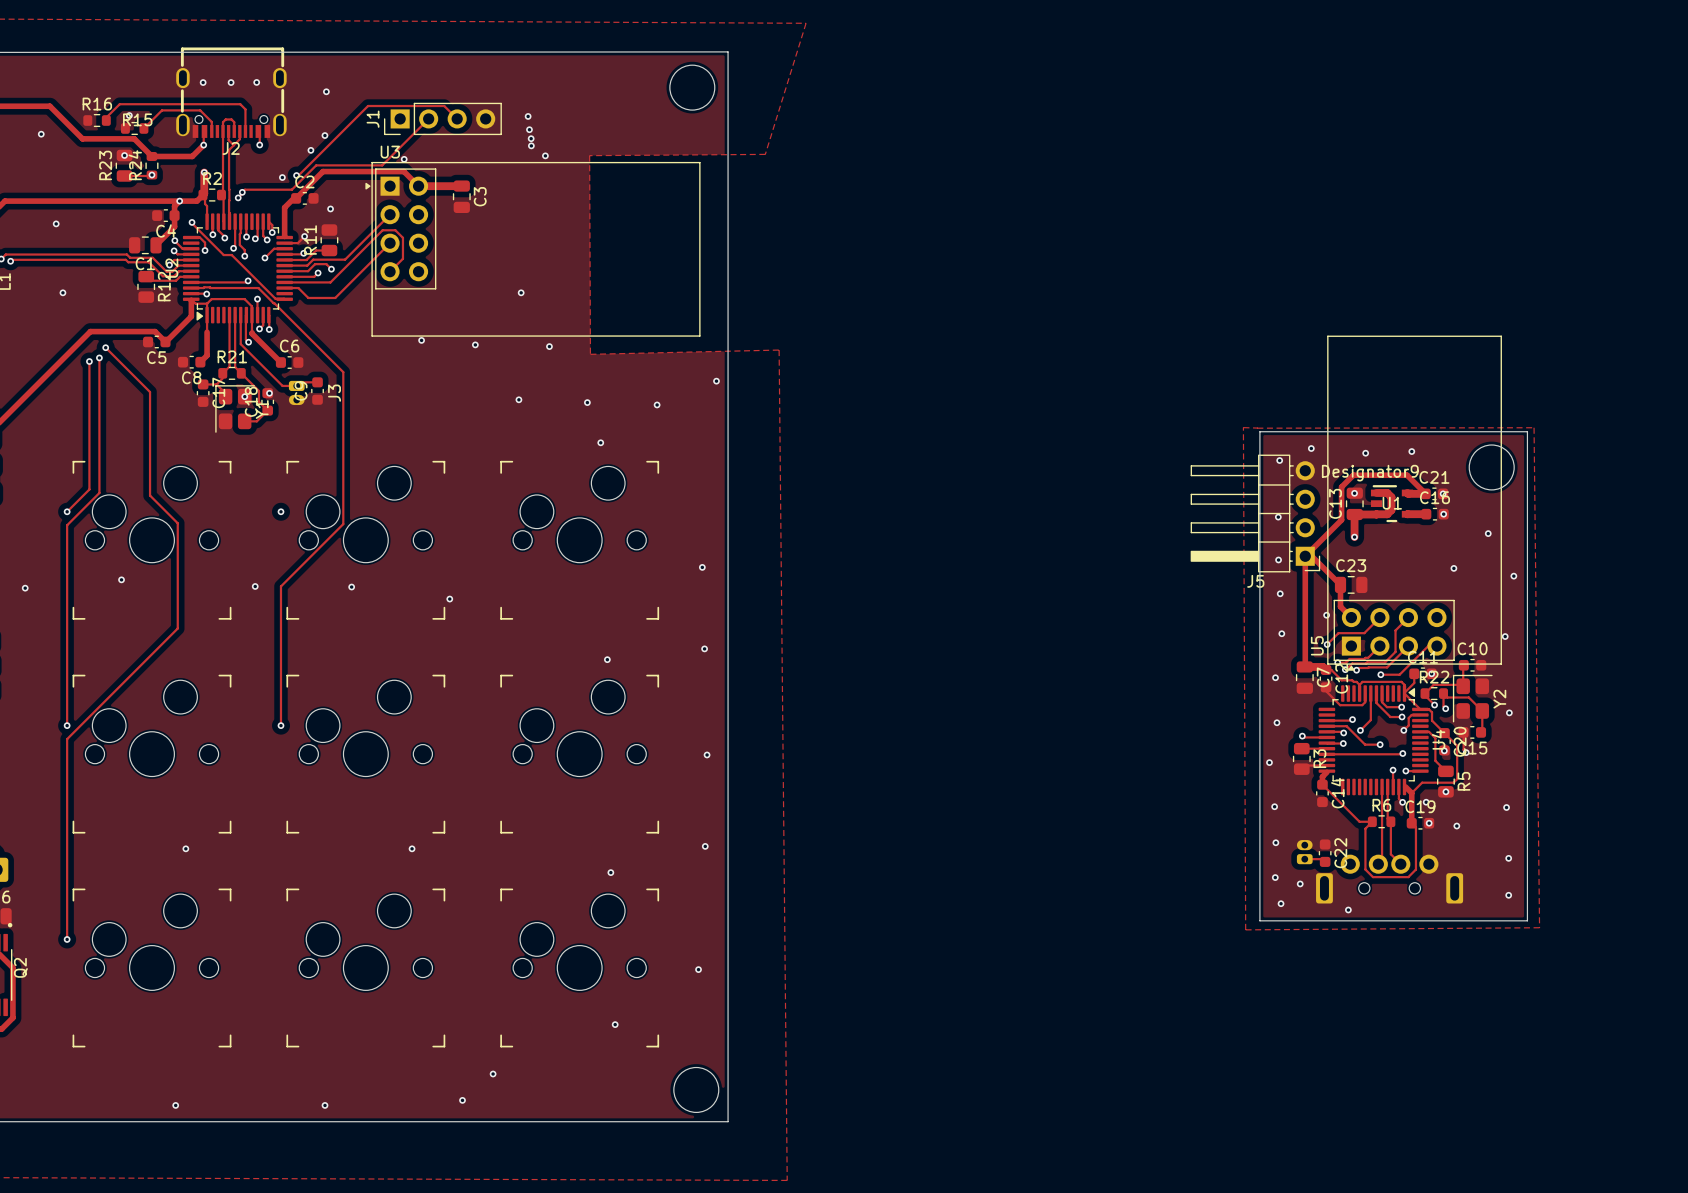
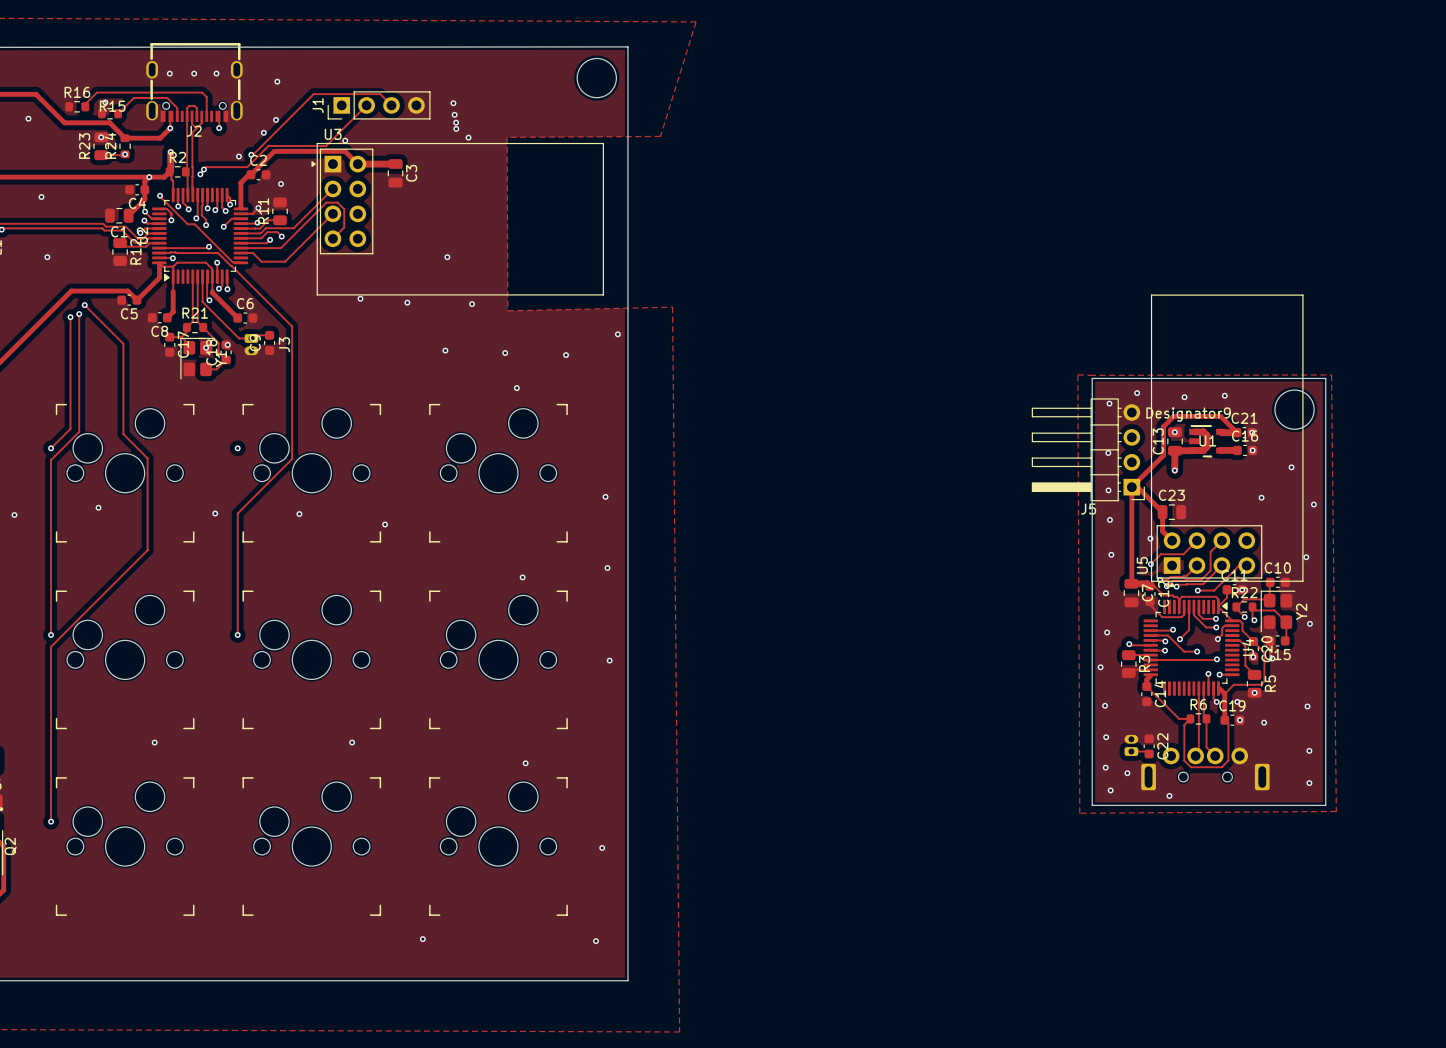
via: (705, 846) -> none
via: (615, 1024) -> none
round board edge: [673, 1067, 720, 1113] -> none
via: none -> (596, 941)
via: (462, 1100) -> none
via: (175, 1105) -> none
via: (324, 1105) -> none

